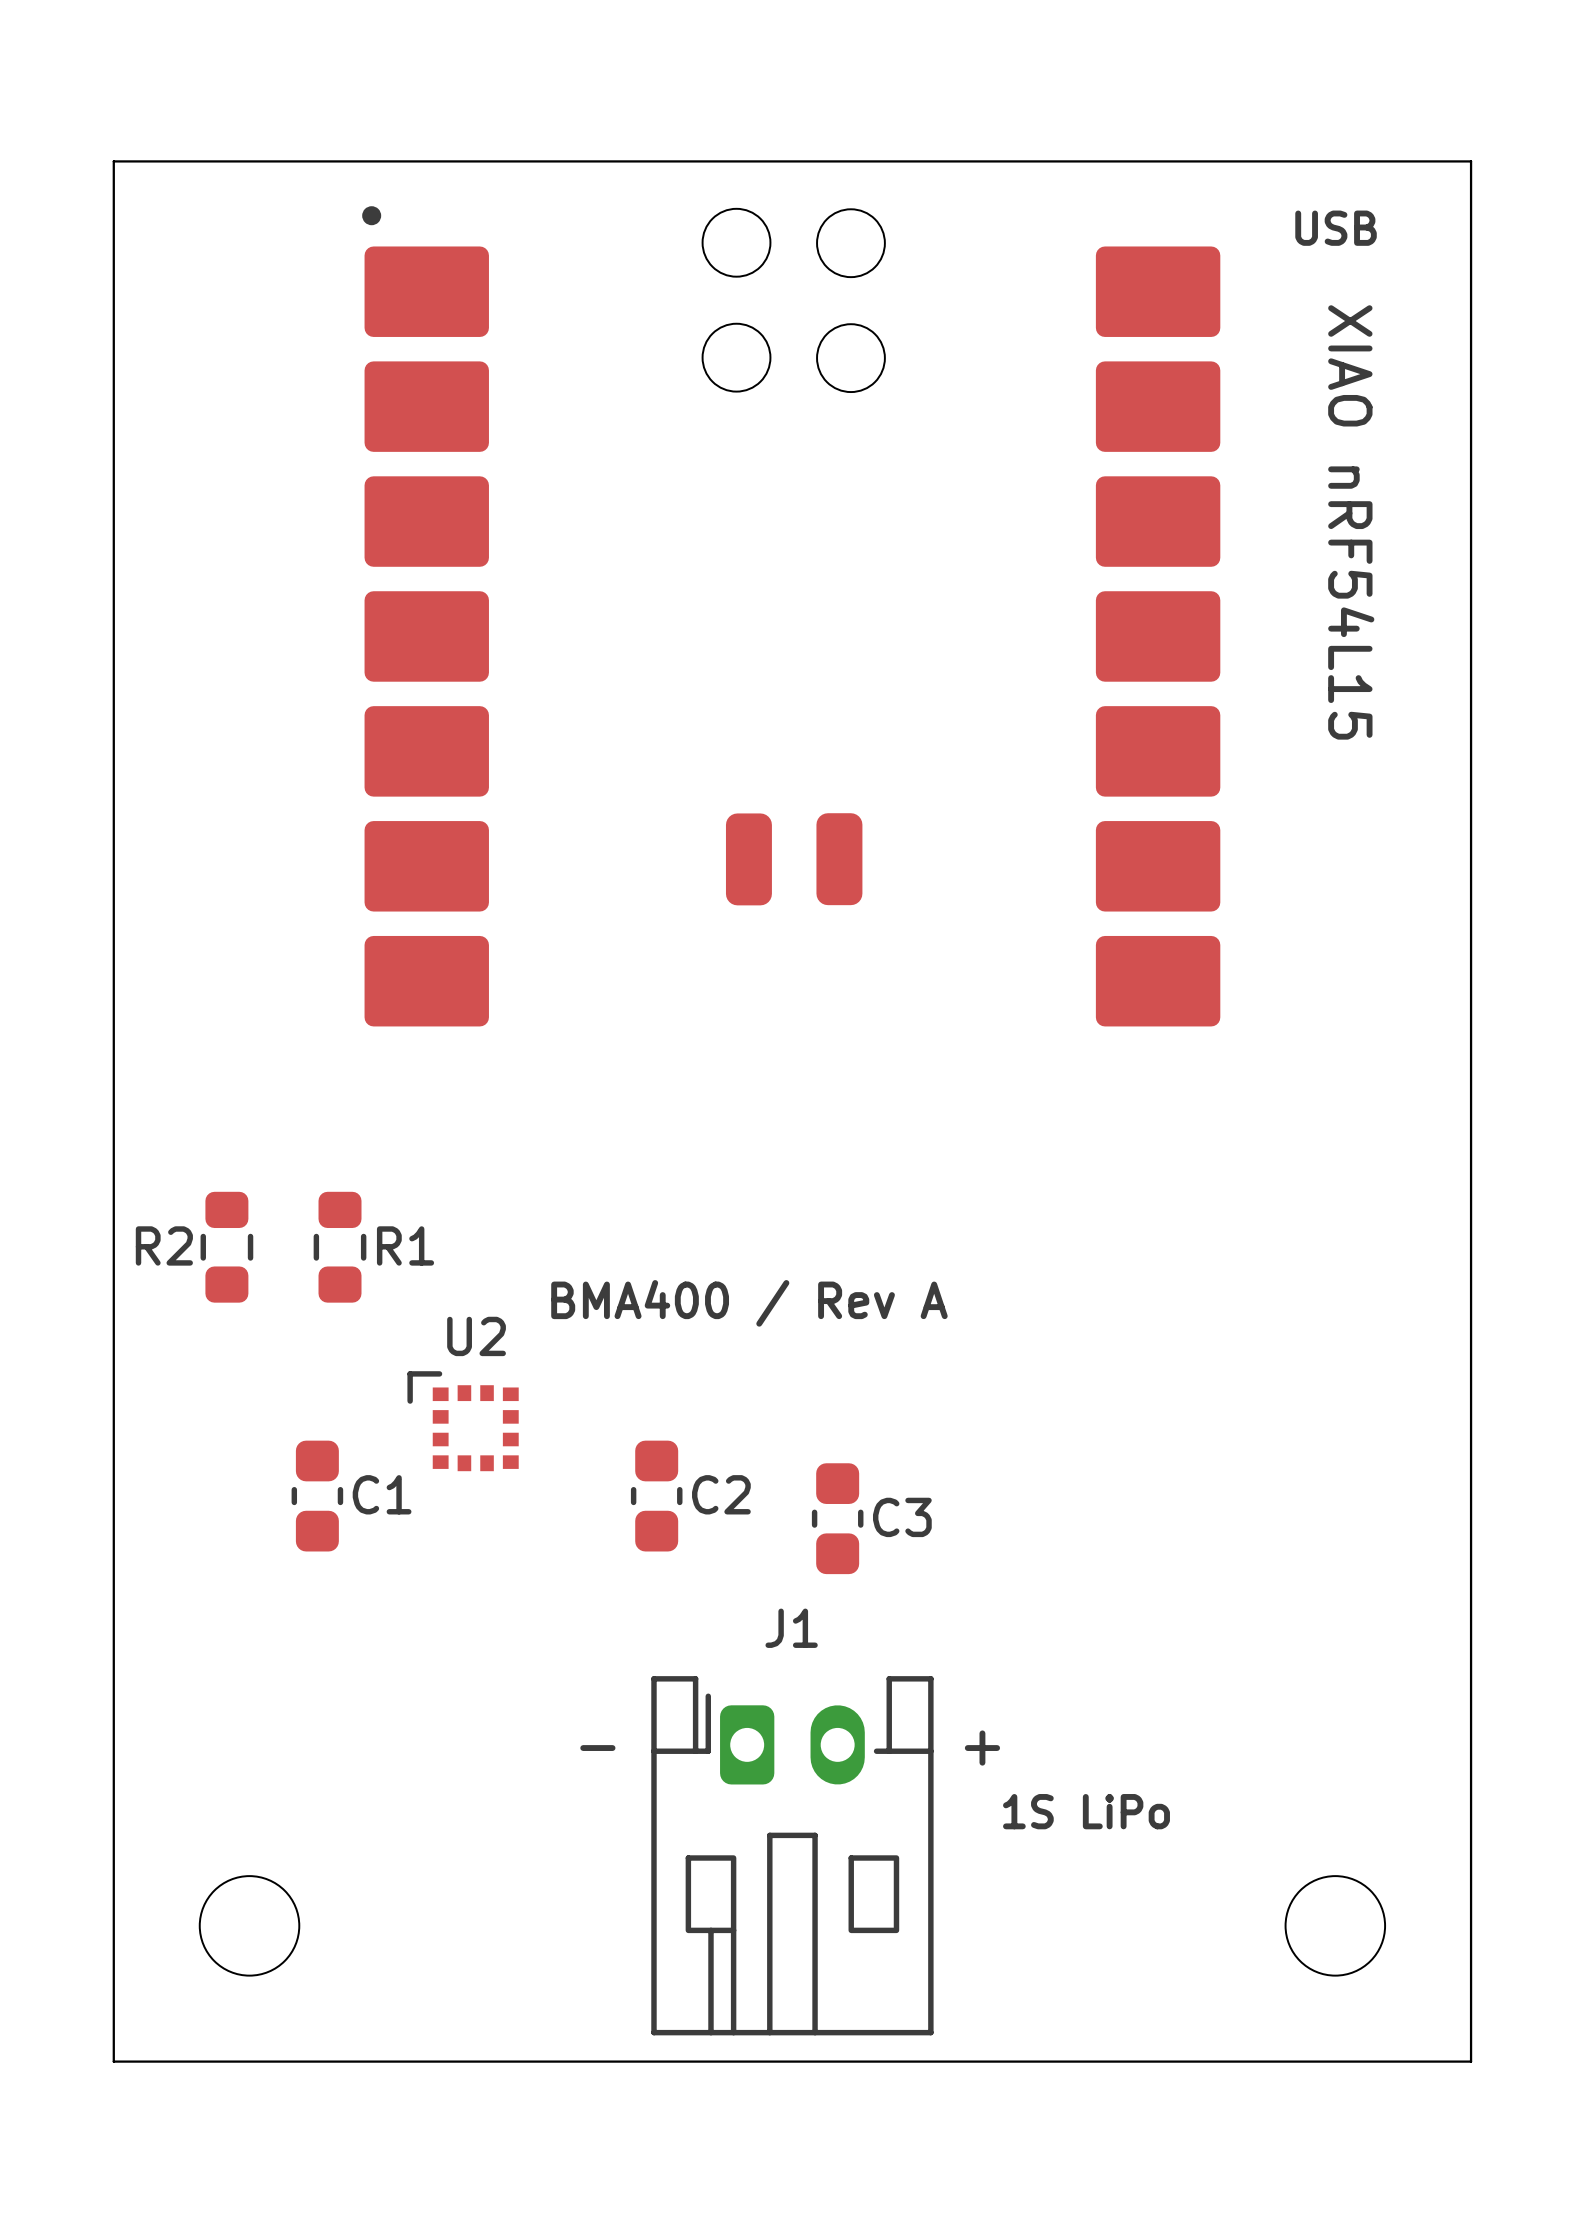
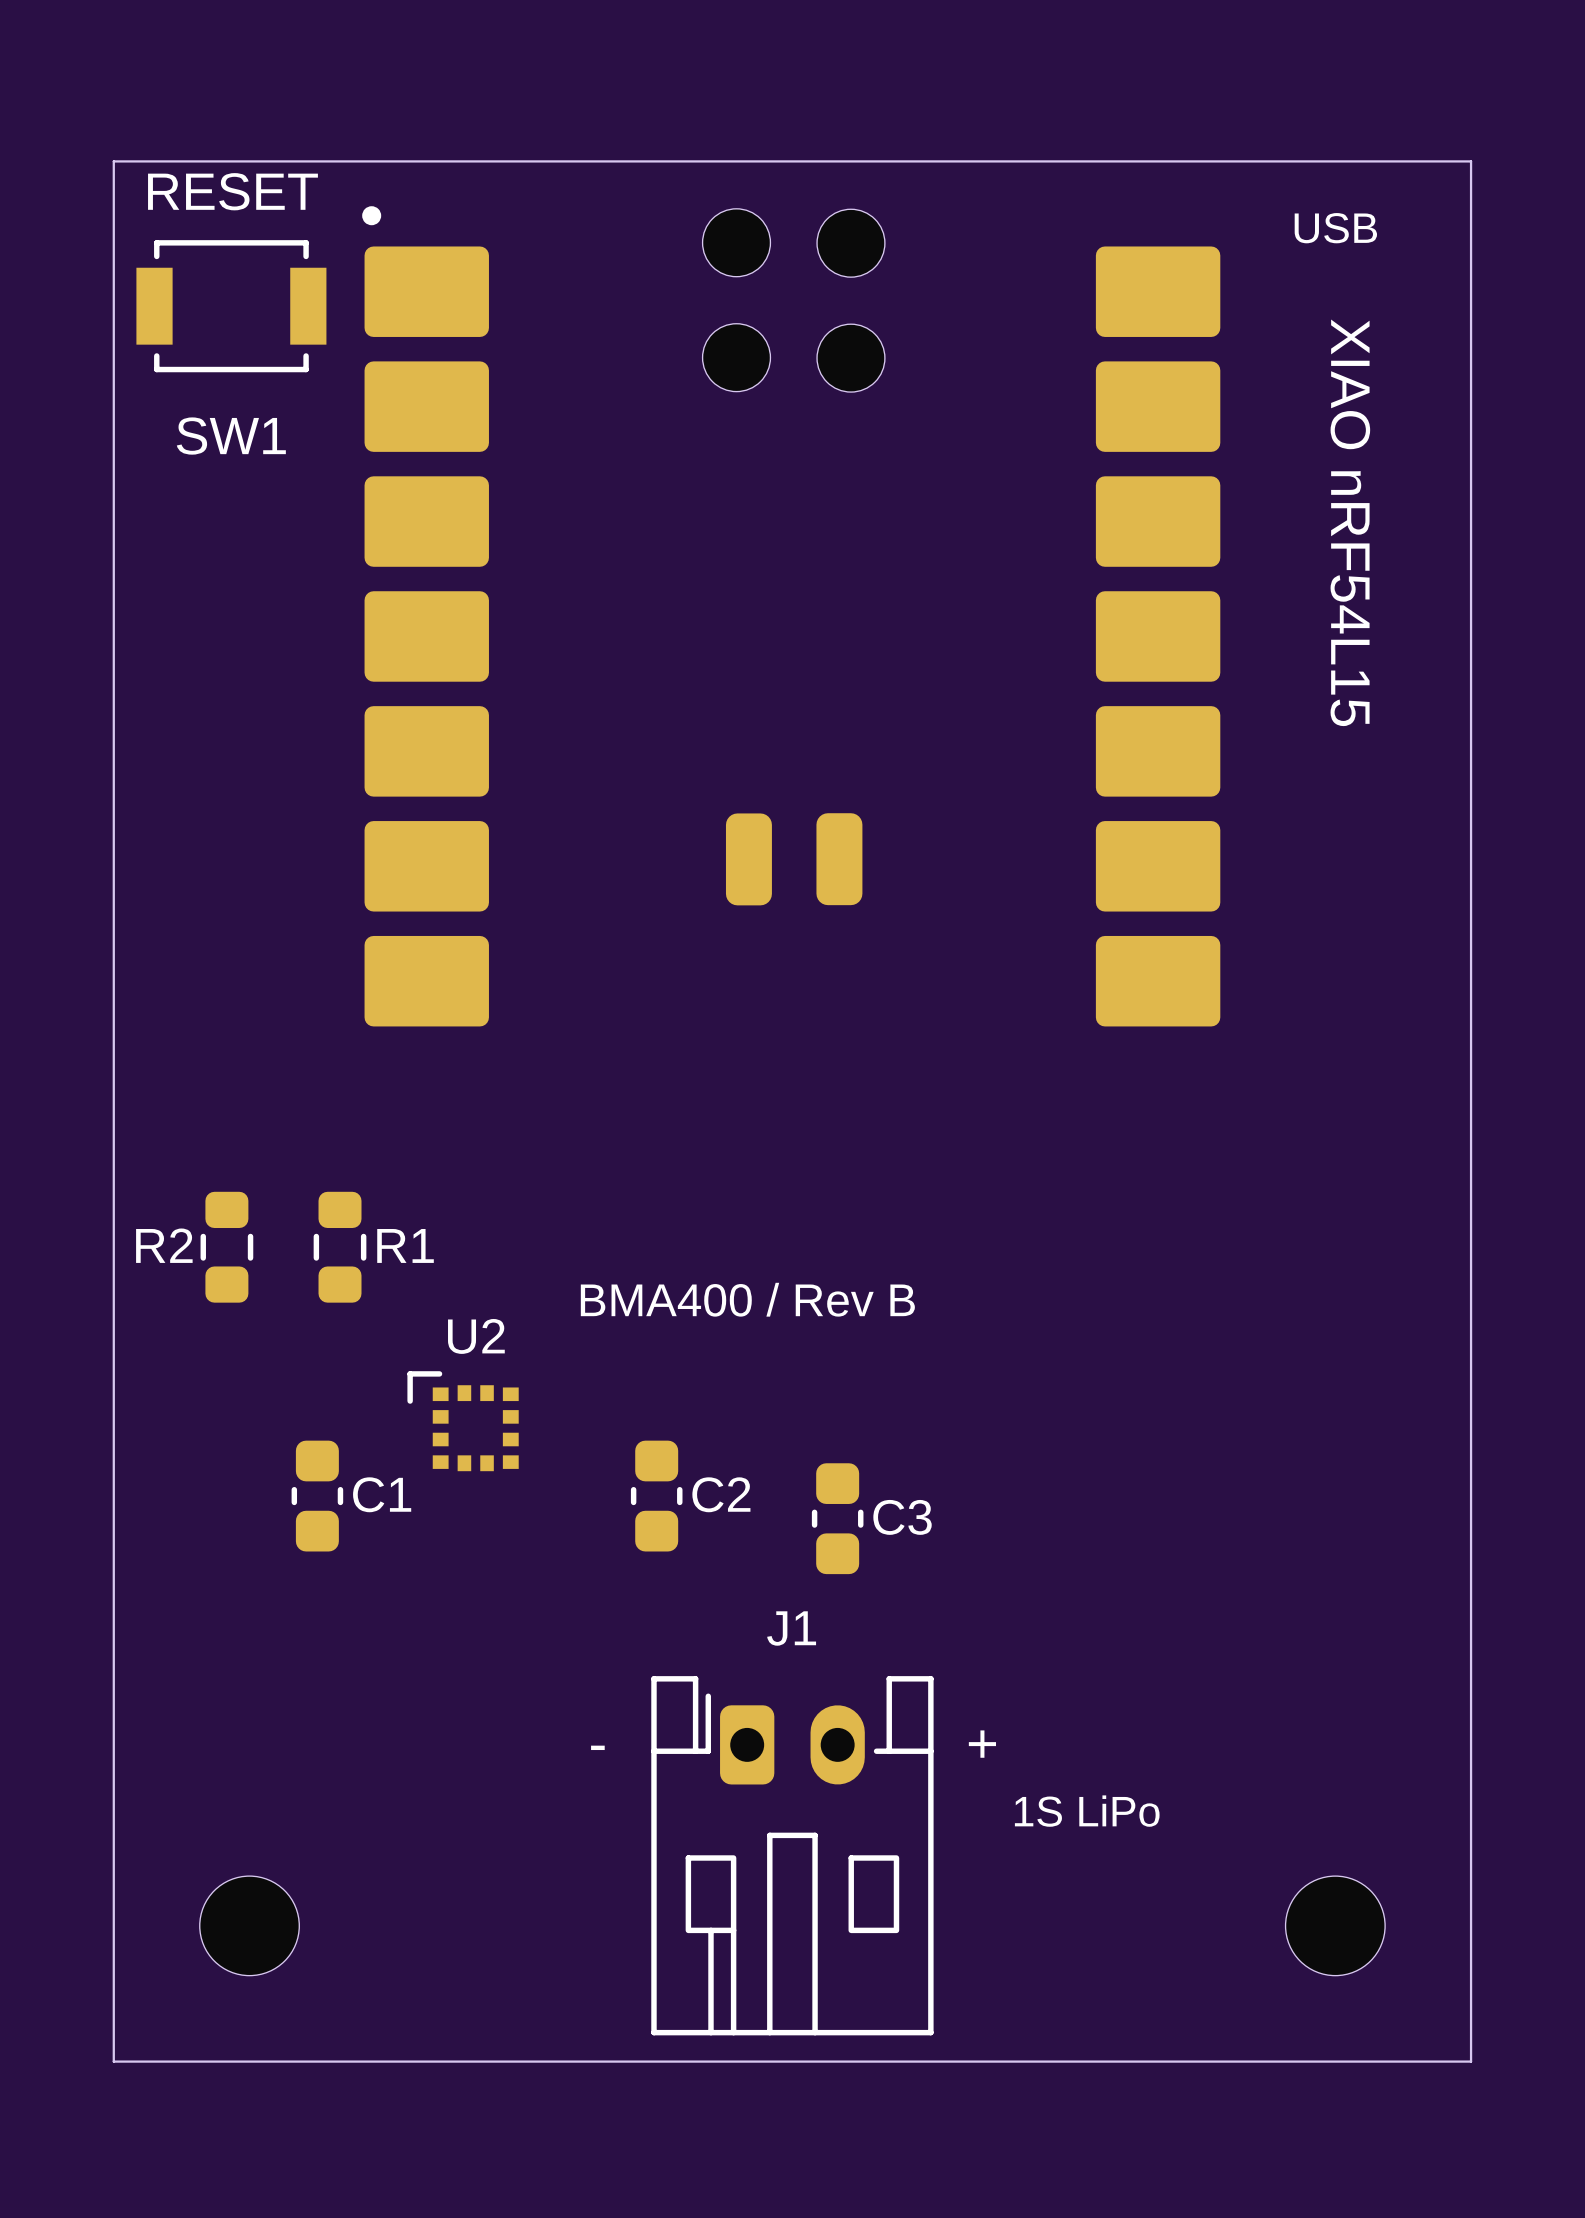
text: none -> RESET (232, 191)
SW1: none -> (231, 306)
text: BMA400 / Rev A (749, 1303) -> BMA400 / Rev B (747, 1299)

